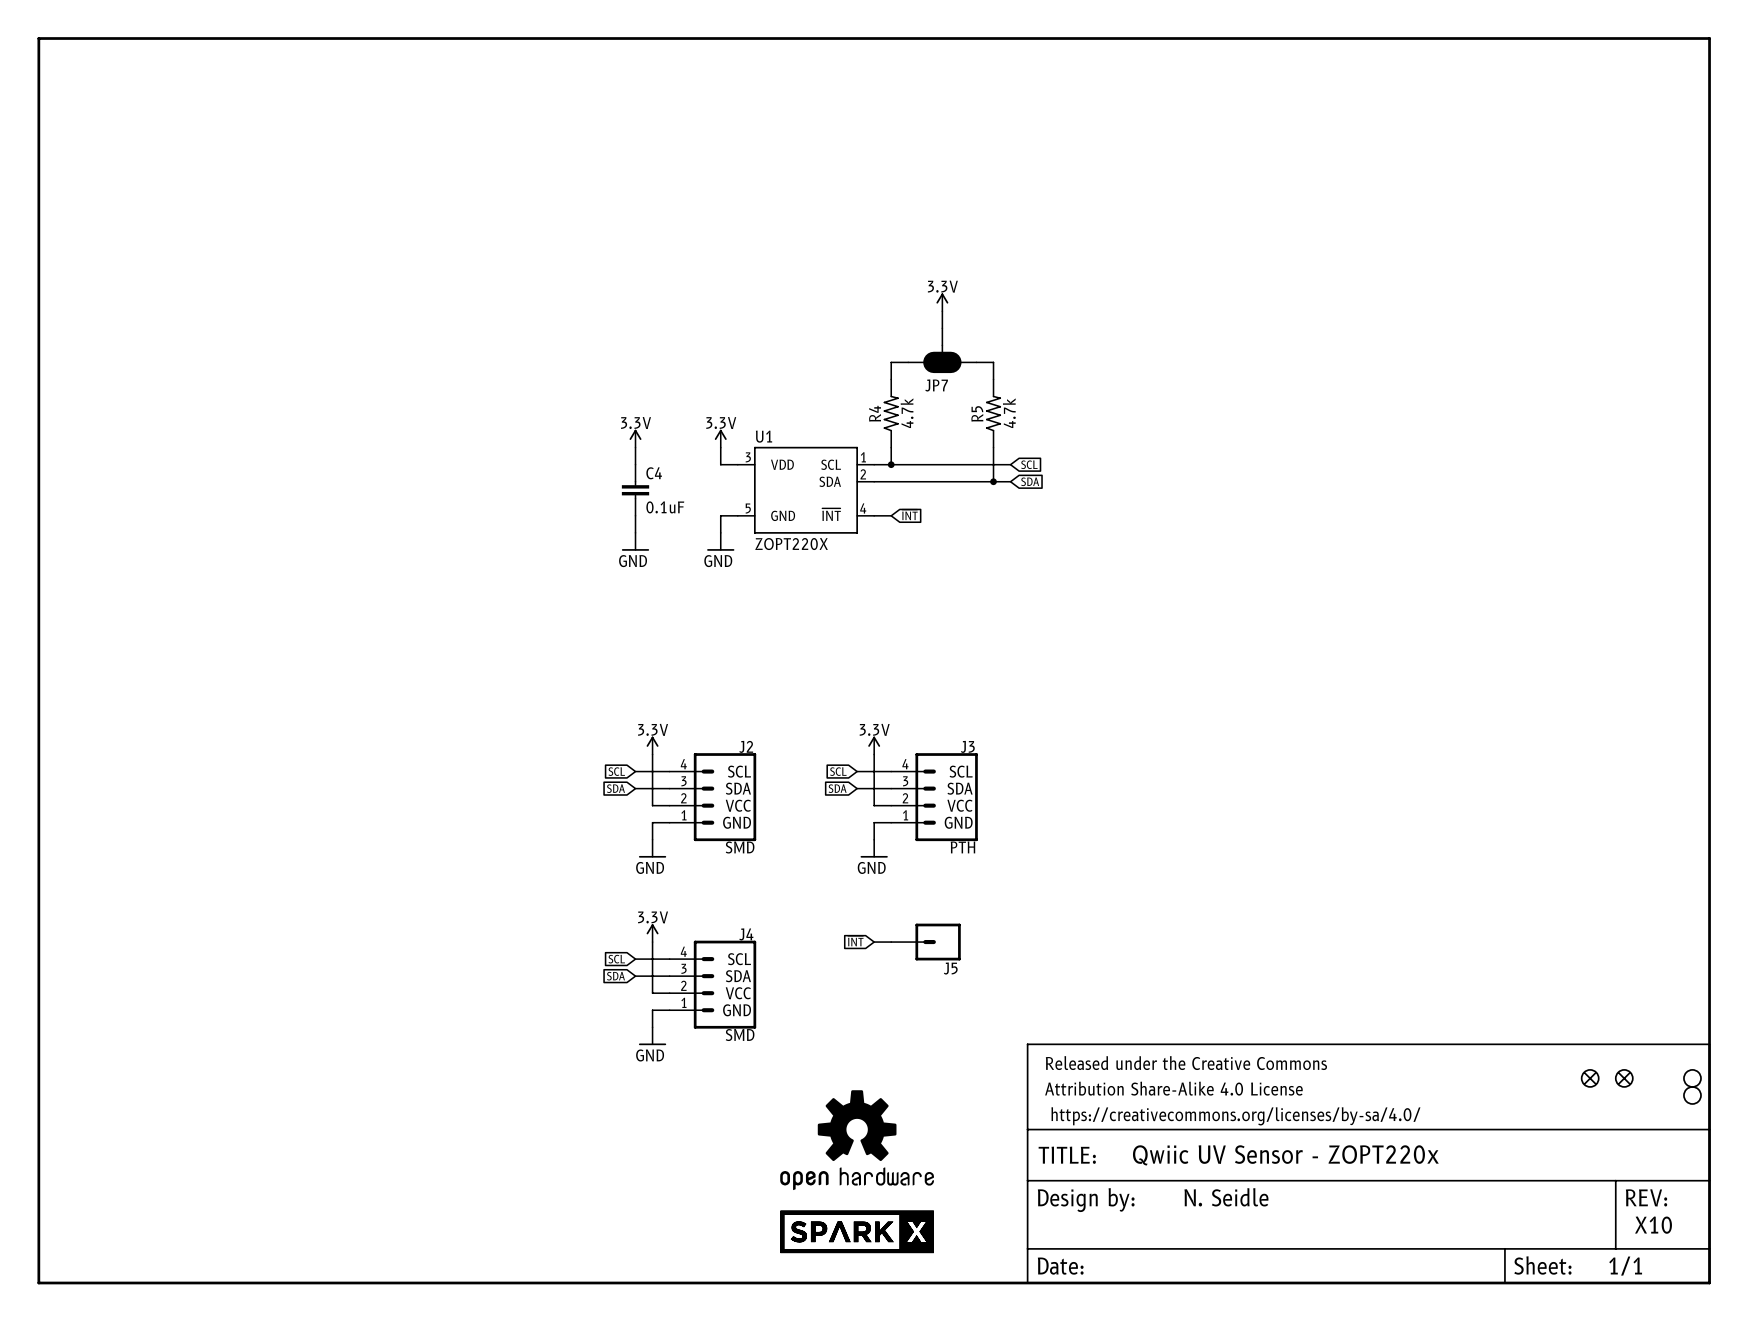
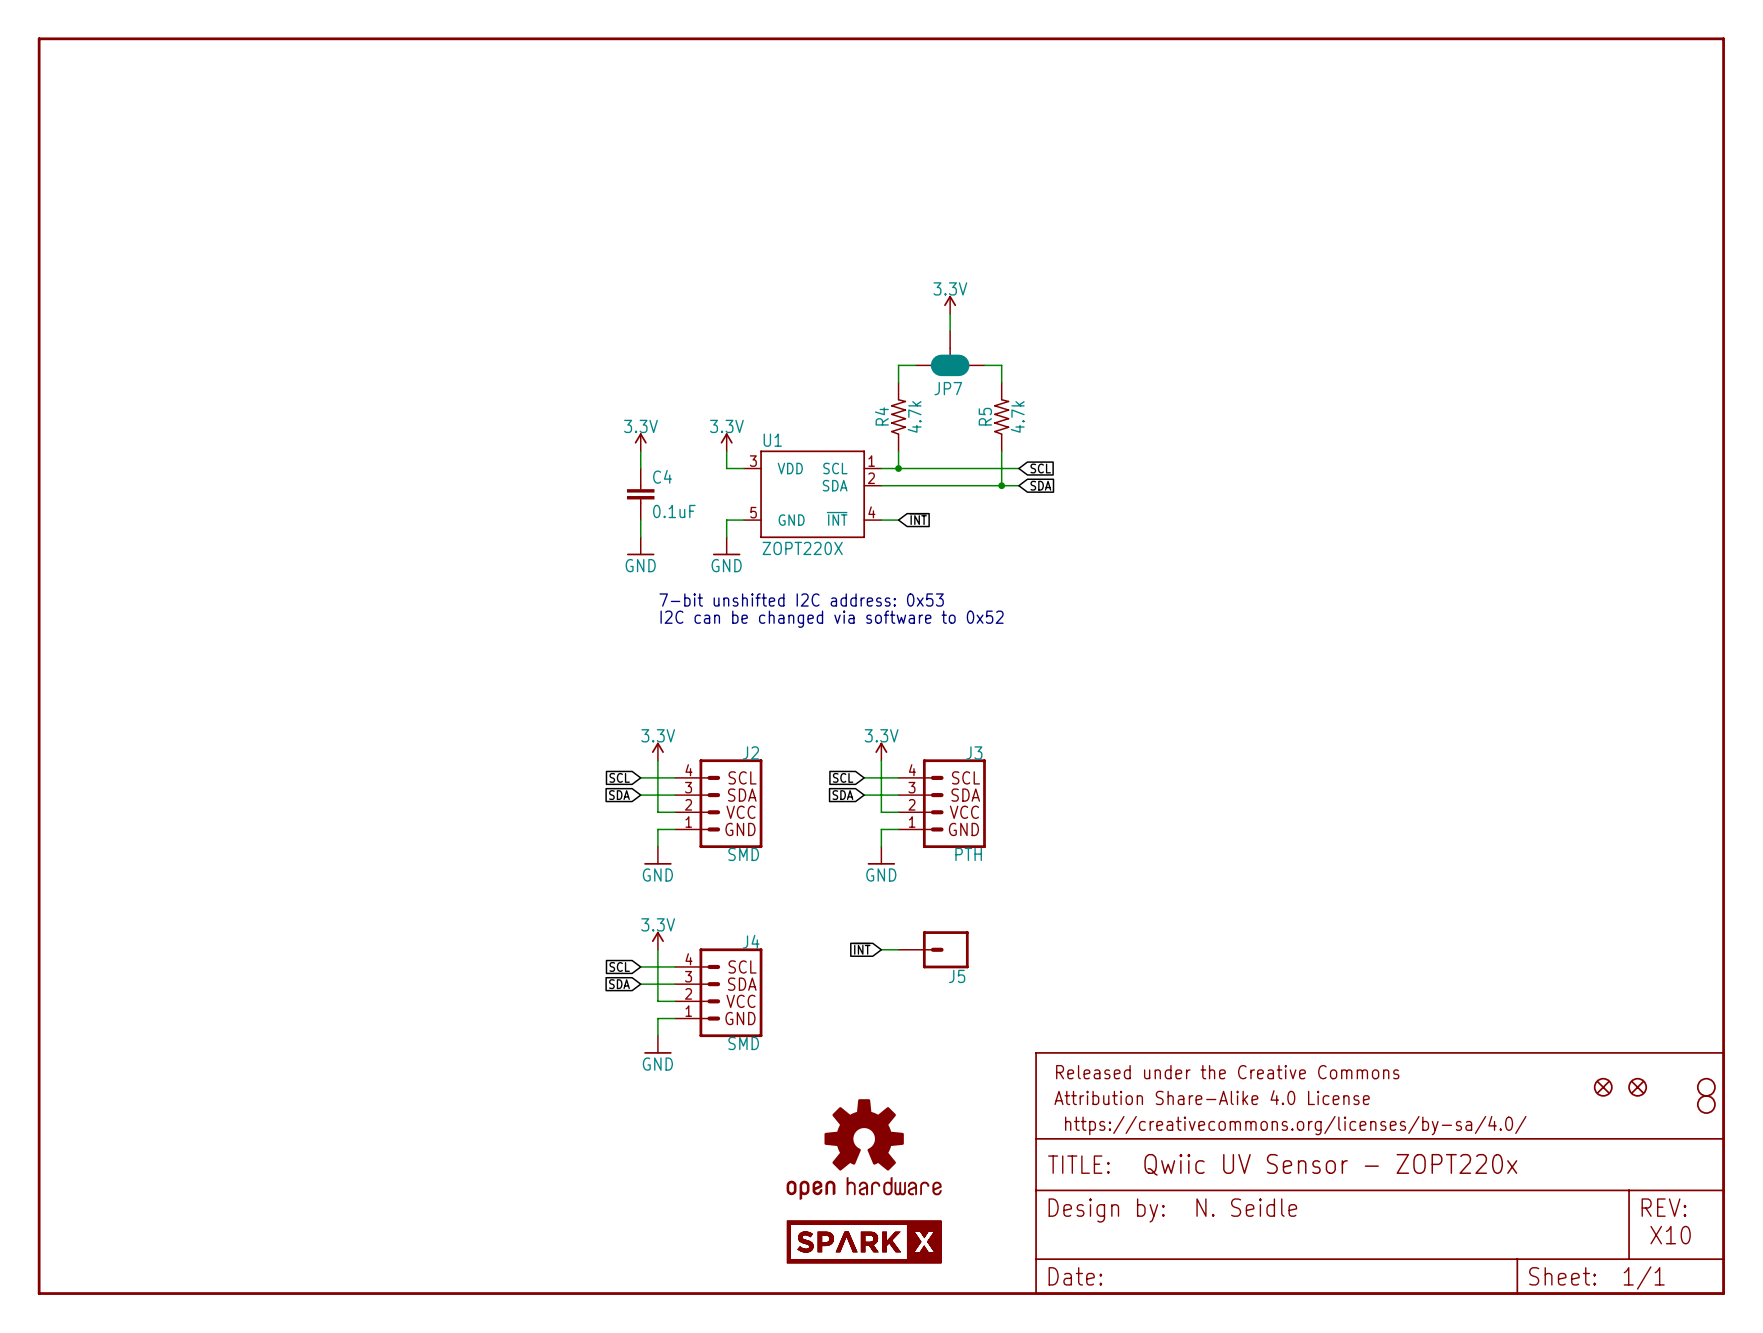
text: none -> 7-bit unshifted I2C address: 0x53 (801, 600)
text: none -> I2C can be changed via software to 0x52 (832, 619)

